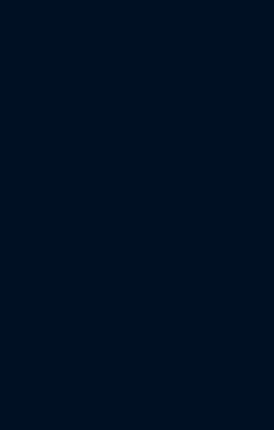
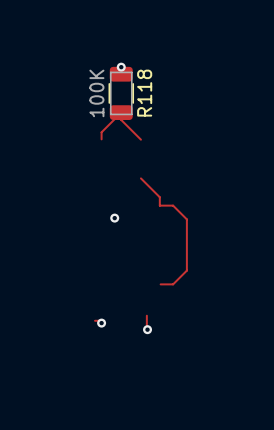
via: none -> (121, 67)
R118: none -> 100K (121, 93)
top track: none -> (101, 139) (101, 132) (121, 112) (121, 120) (140, 139)
top track: none -> (140, 178) (159, 197) (159, 205) (173, 205) (186, 219) (186, 270) (173, 284) (160, 284)
via: none -> (114, 218)
top track: none -> (146, 315) (147, 329)
top track: none -> (95, 320) (101, 323)
via: none -> (101, 323)
via: none -> (147, 329)

